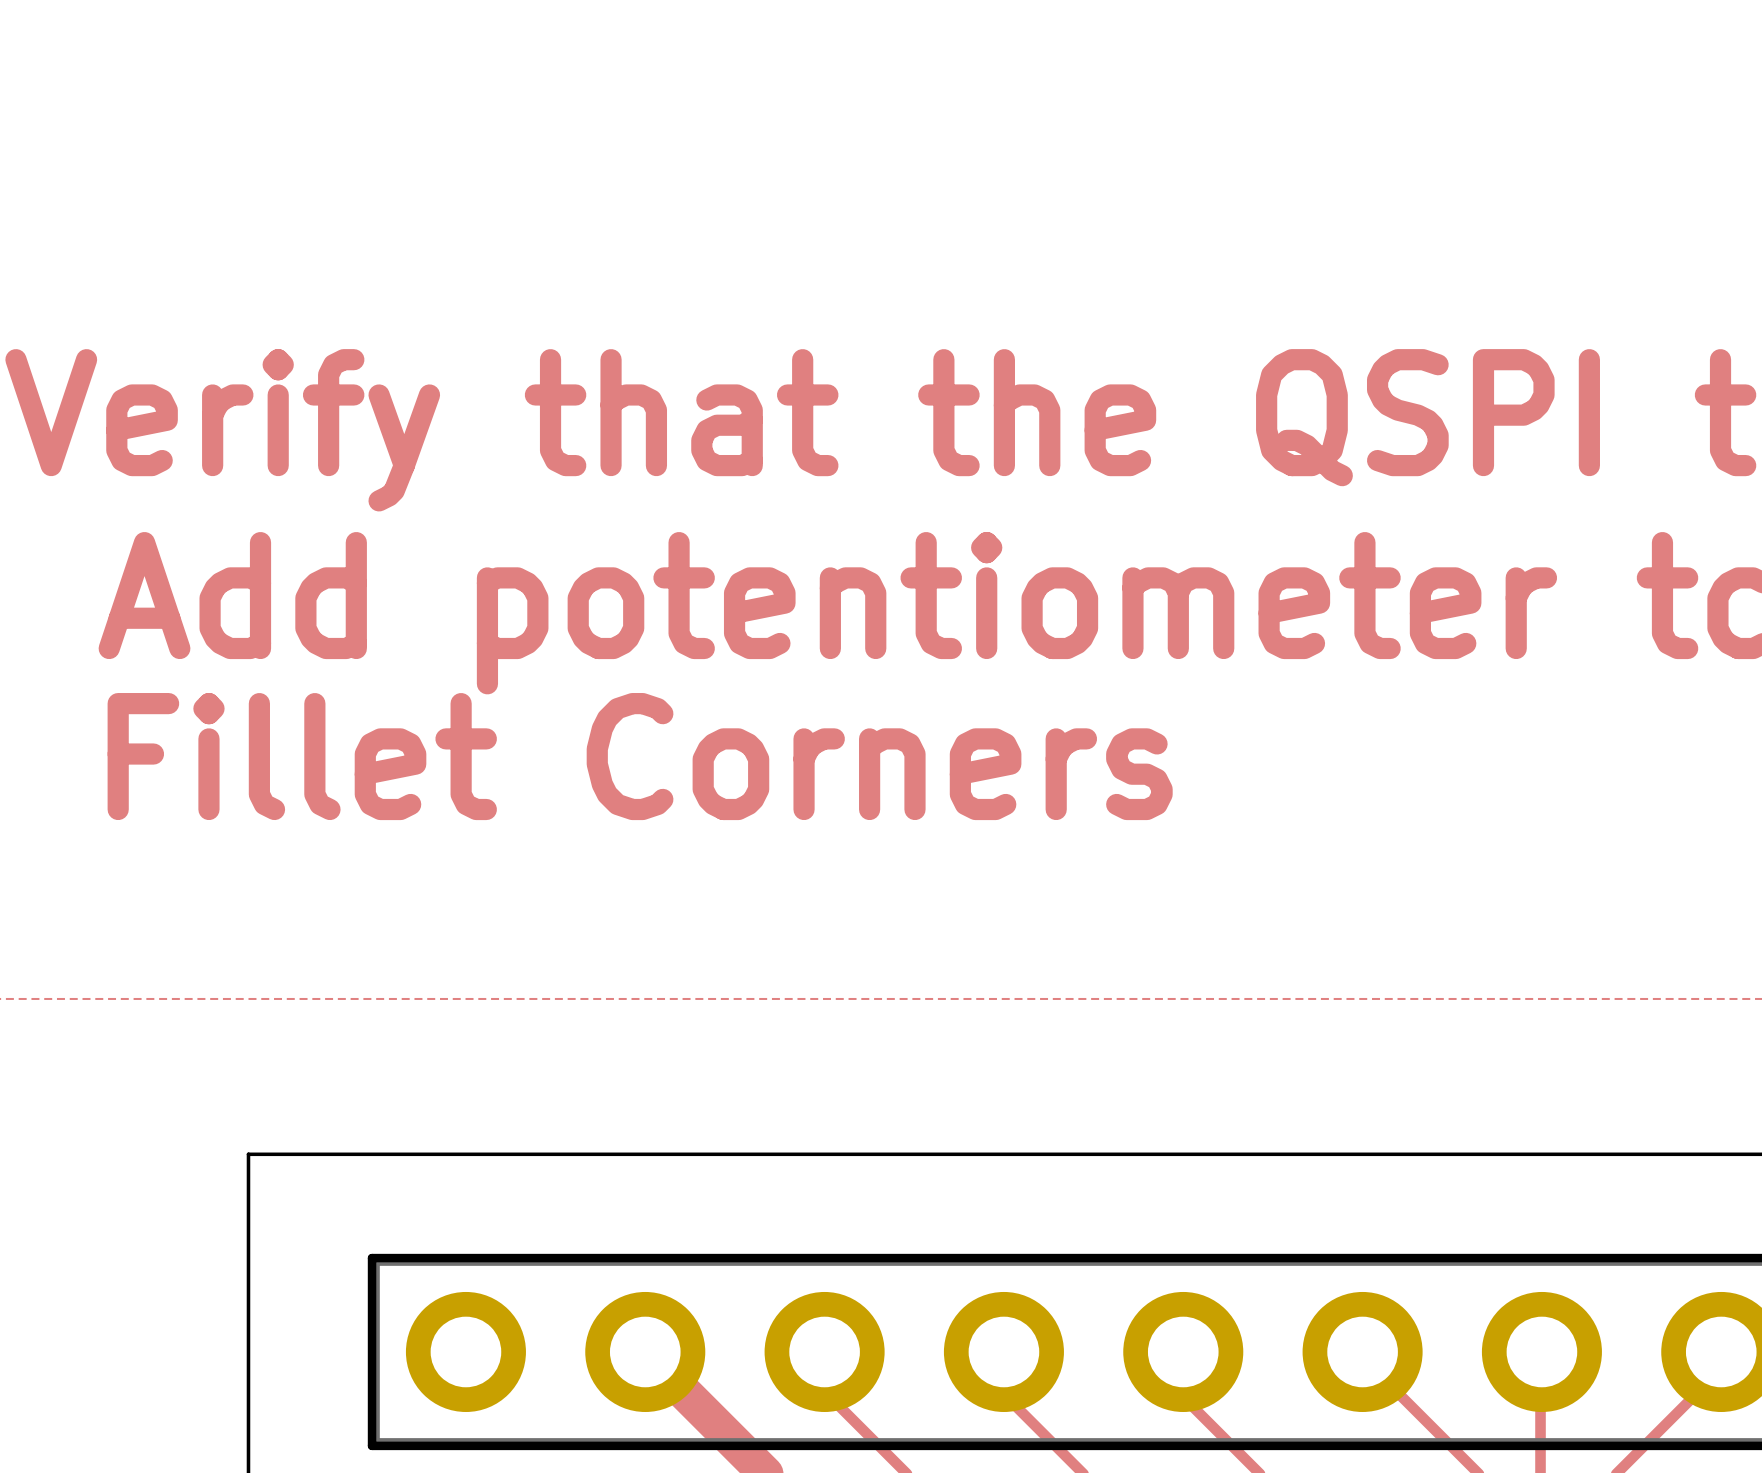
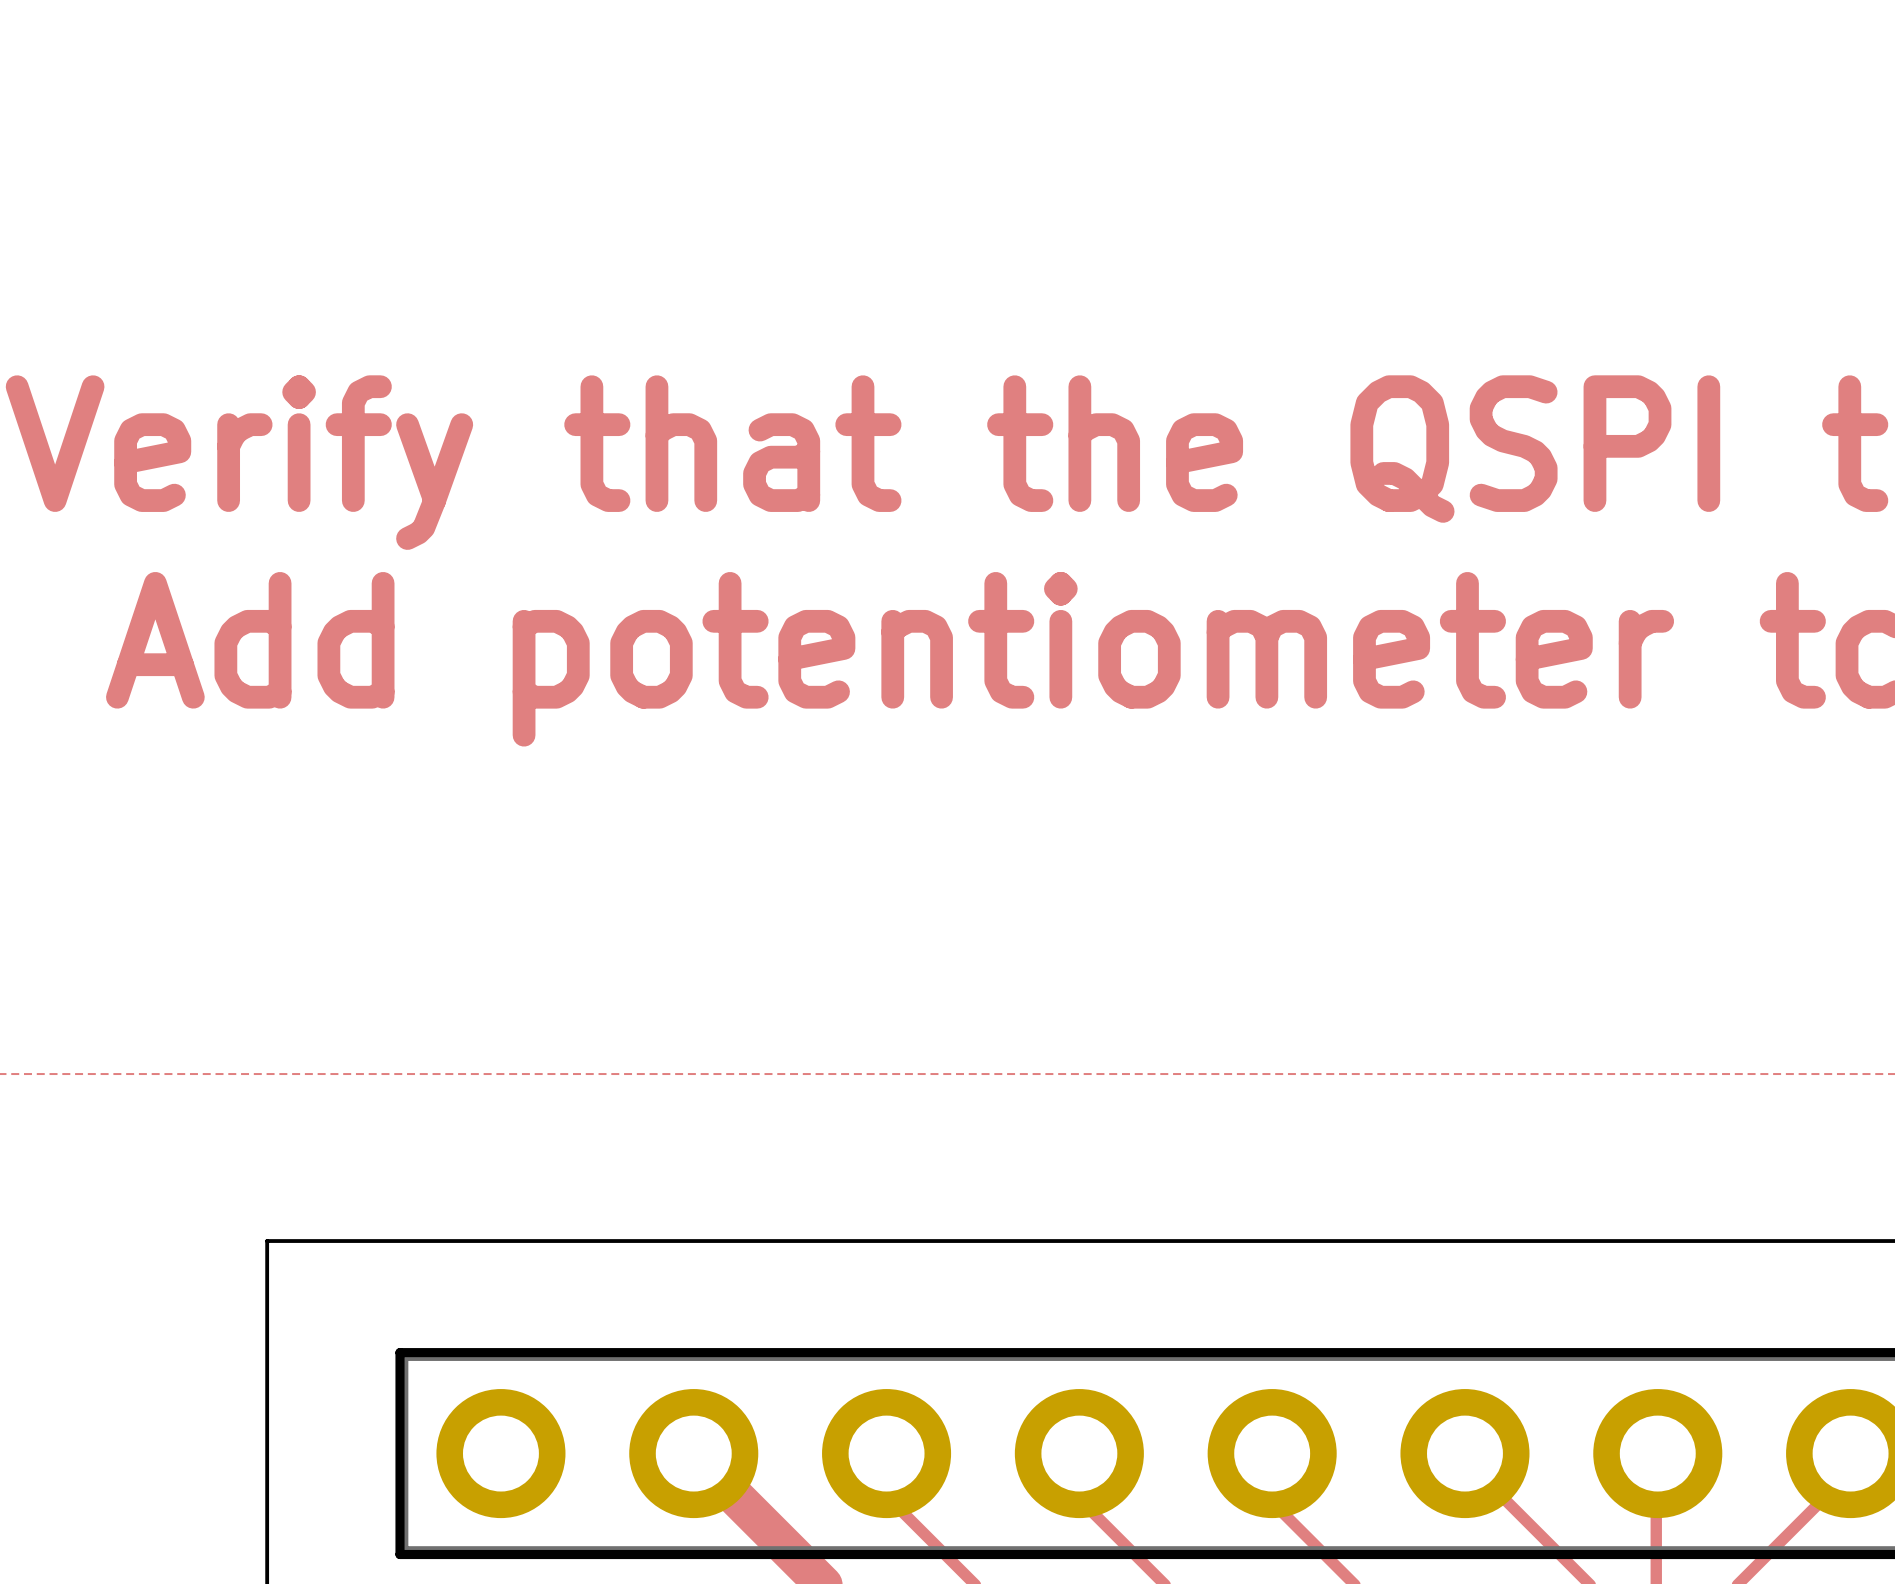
text: Fillet Corners (640, 756) -> none

